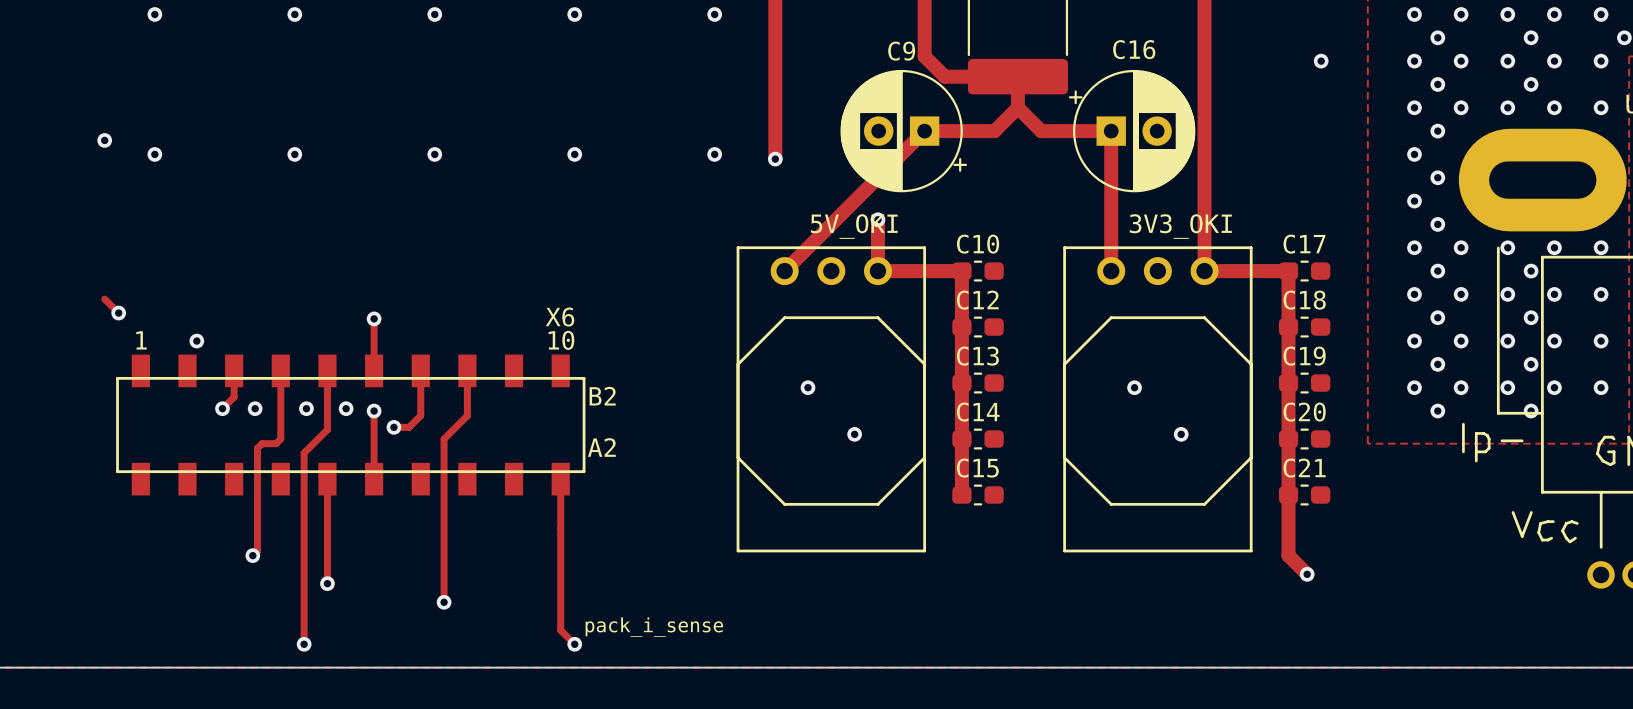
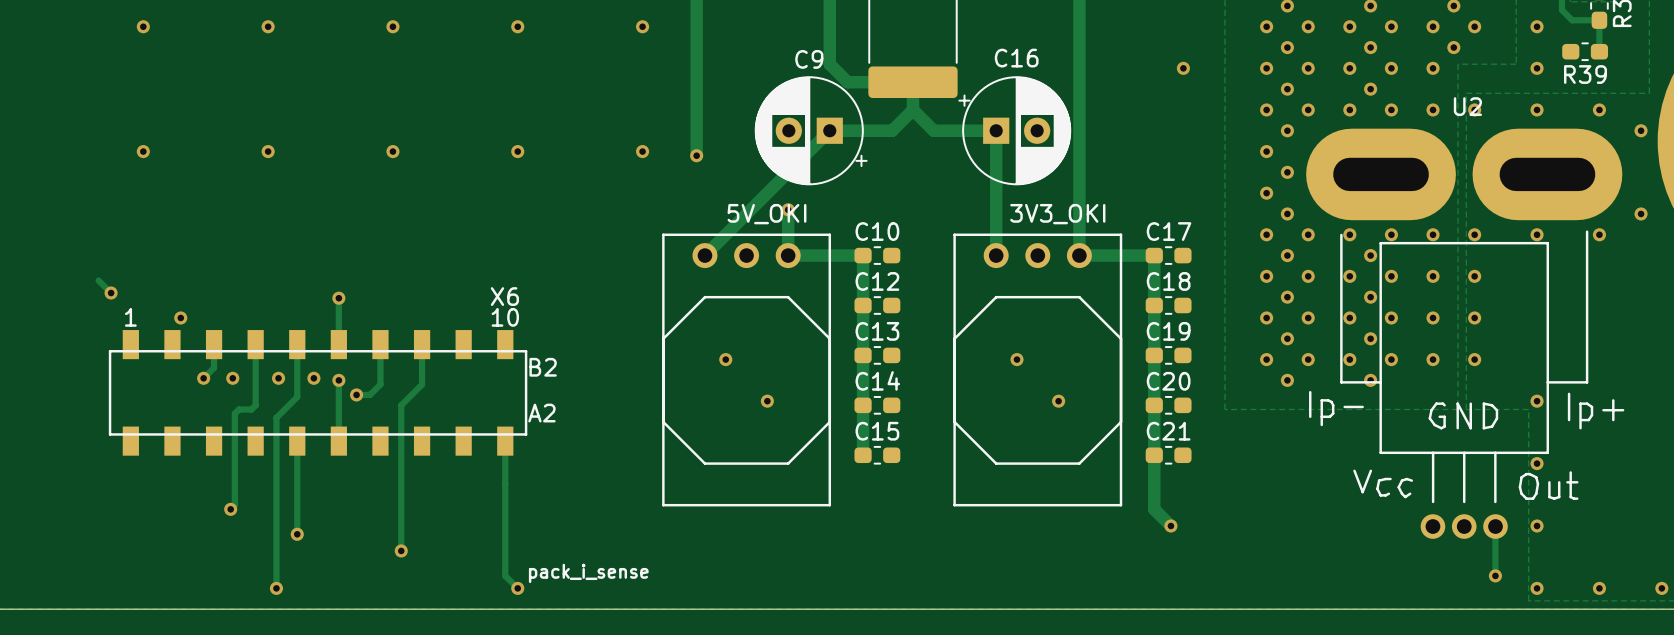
via: (104, 140) -> none

